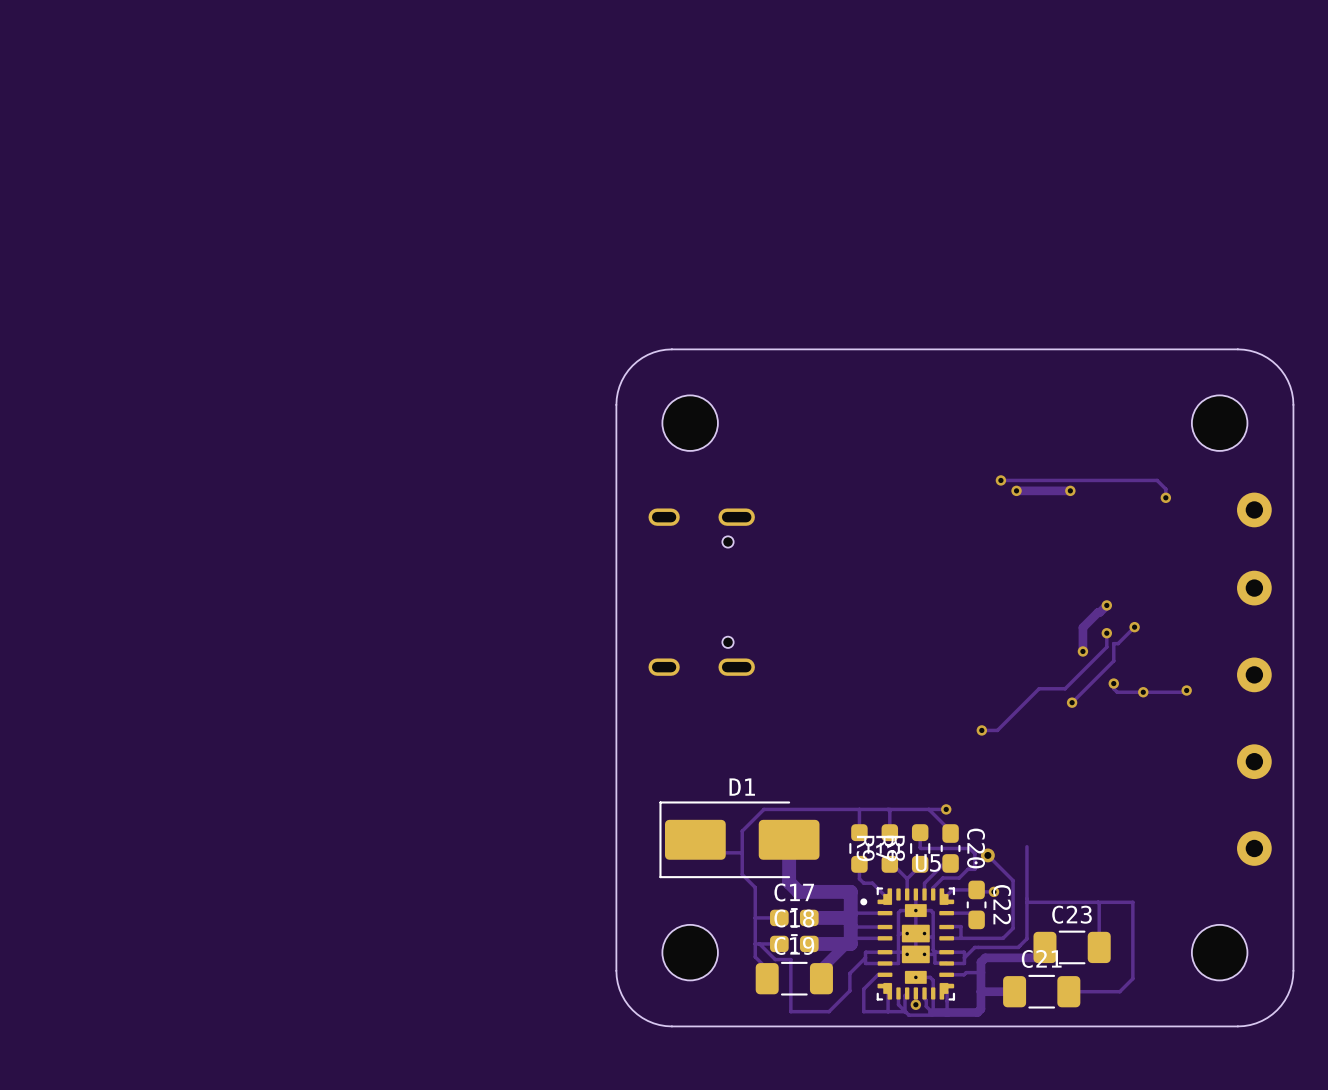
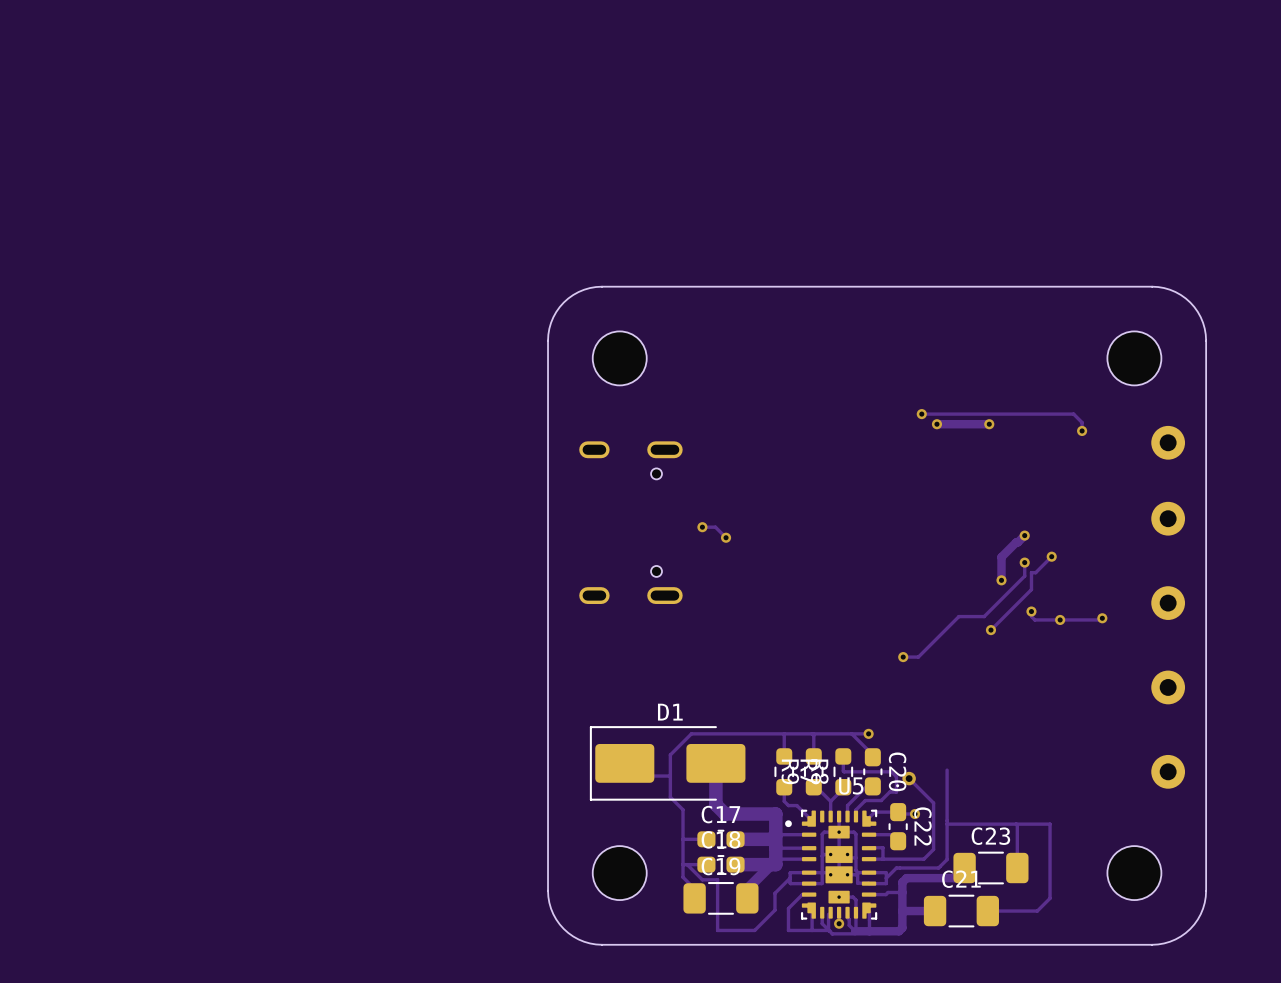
track: none -> (702, 527) (715, 527) (726, 537)
via: none -> (702, 527)
via: none -> (726, 537)

